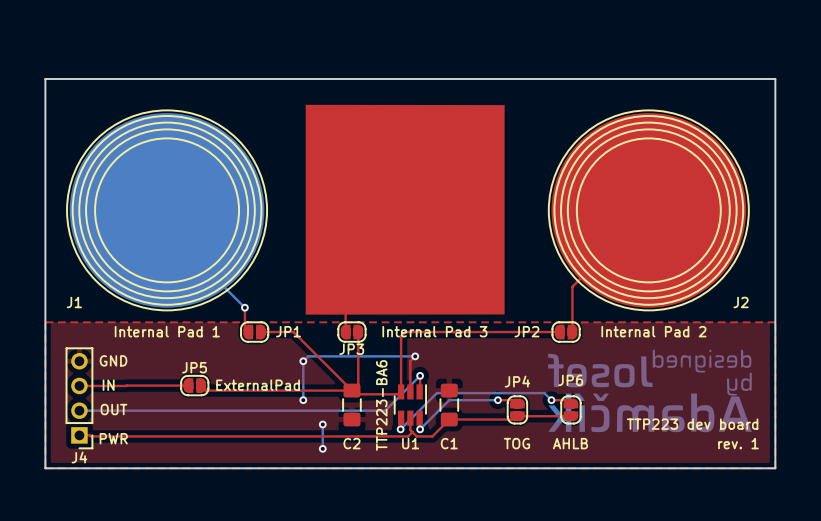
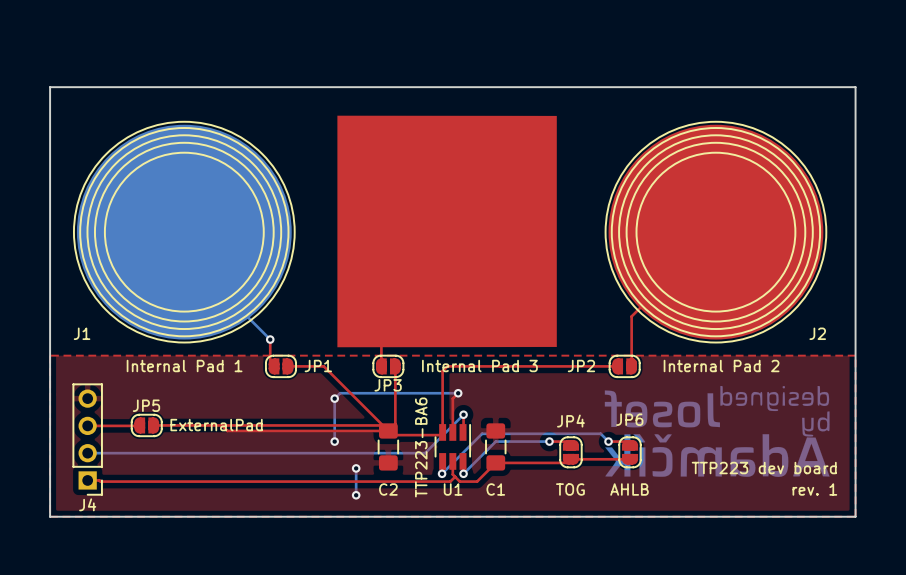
text: GND (113, 360) -> none
text: IN (108, 385) -> none
top track: (126, 385) (139, 385) -> none
top track: none -> (207, 425) (382, 425)
JP5 position: (194, 385) -> (146, 425)
text: OUT (113, 409) -> none
text: PWR (113, 438) -> none

